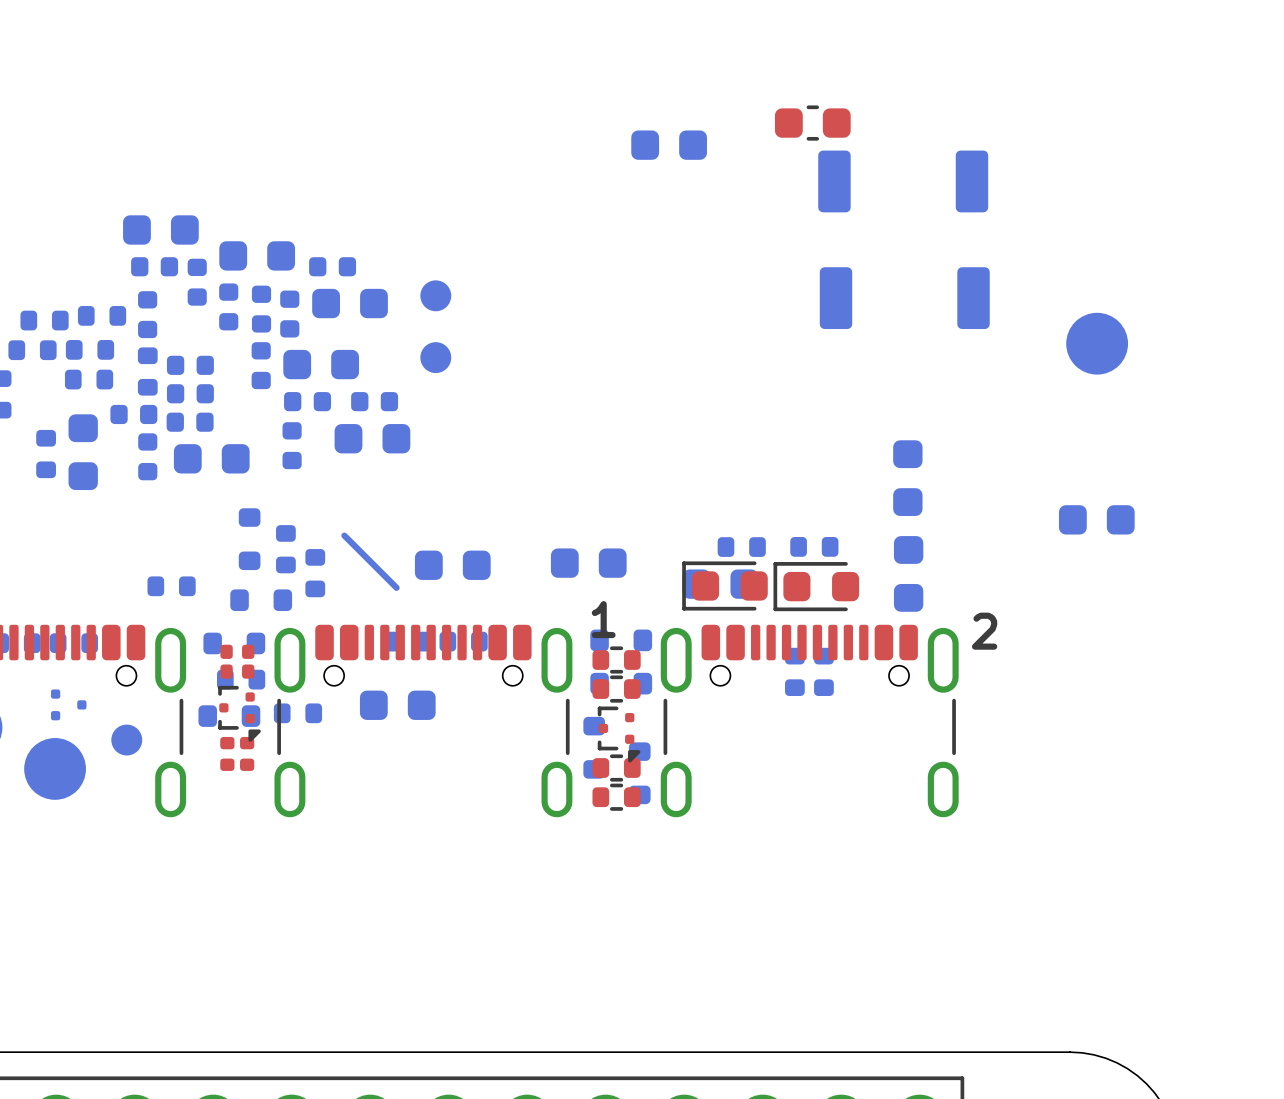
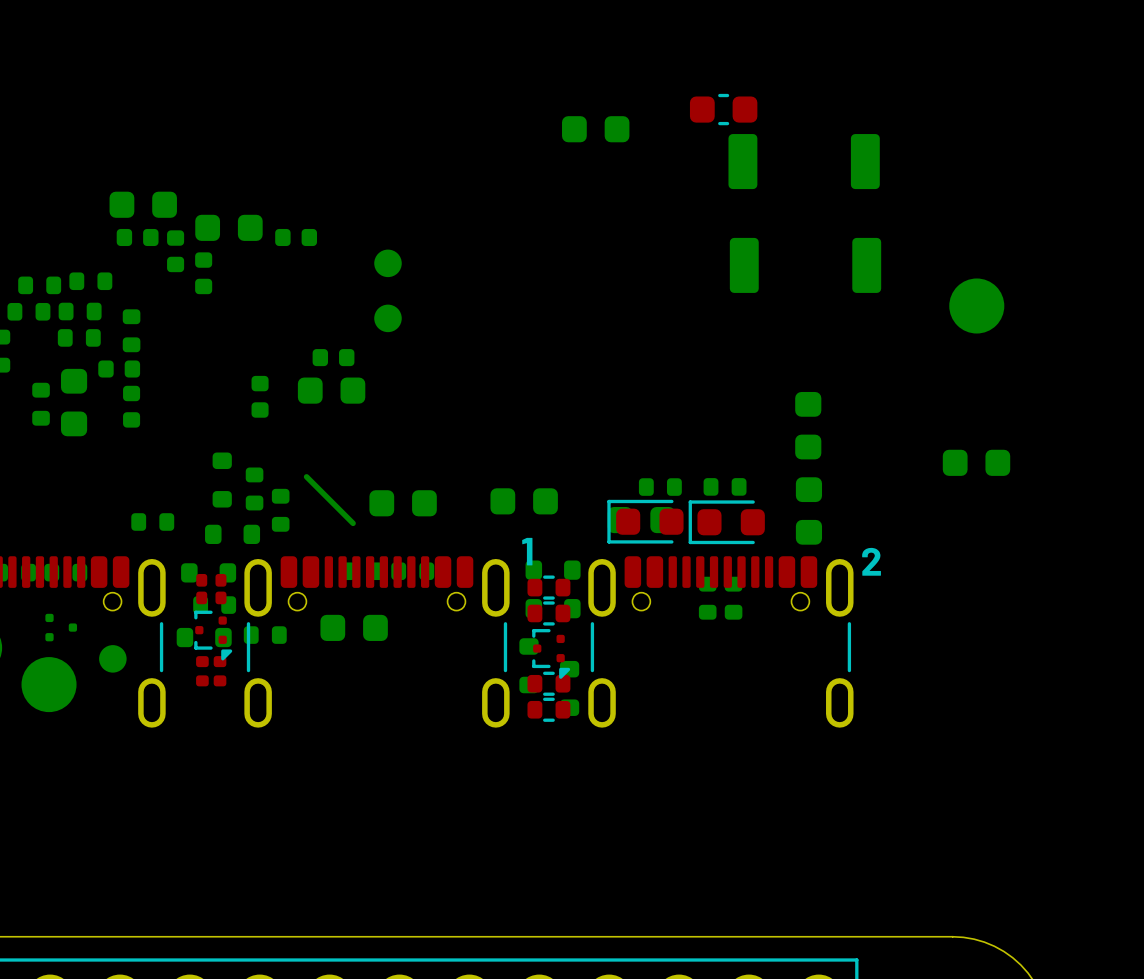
part: (350, 303) -> none
part: (261, 309) -> none
part: (147, 314) -> none
part: (289, 314) -> none
part: (321, 364) -> none
part: (190, 365) -> none
part: (261, 365) -> none
part: (190, 393) -> none
part: (307, 401) -> none
part: (190, 422) -> none
part: (211, 458) -> none

